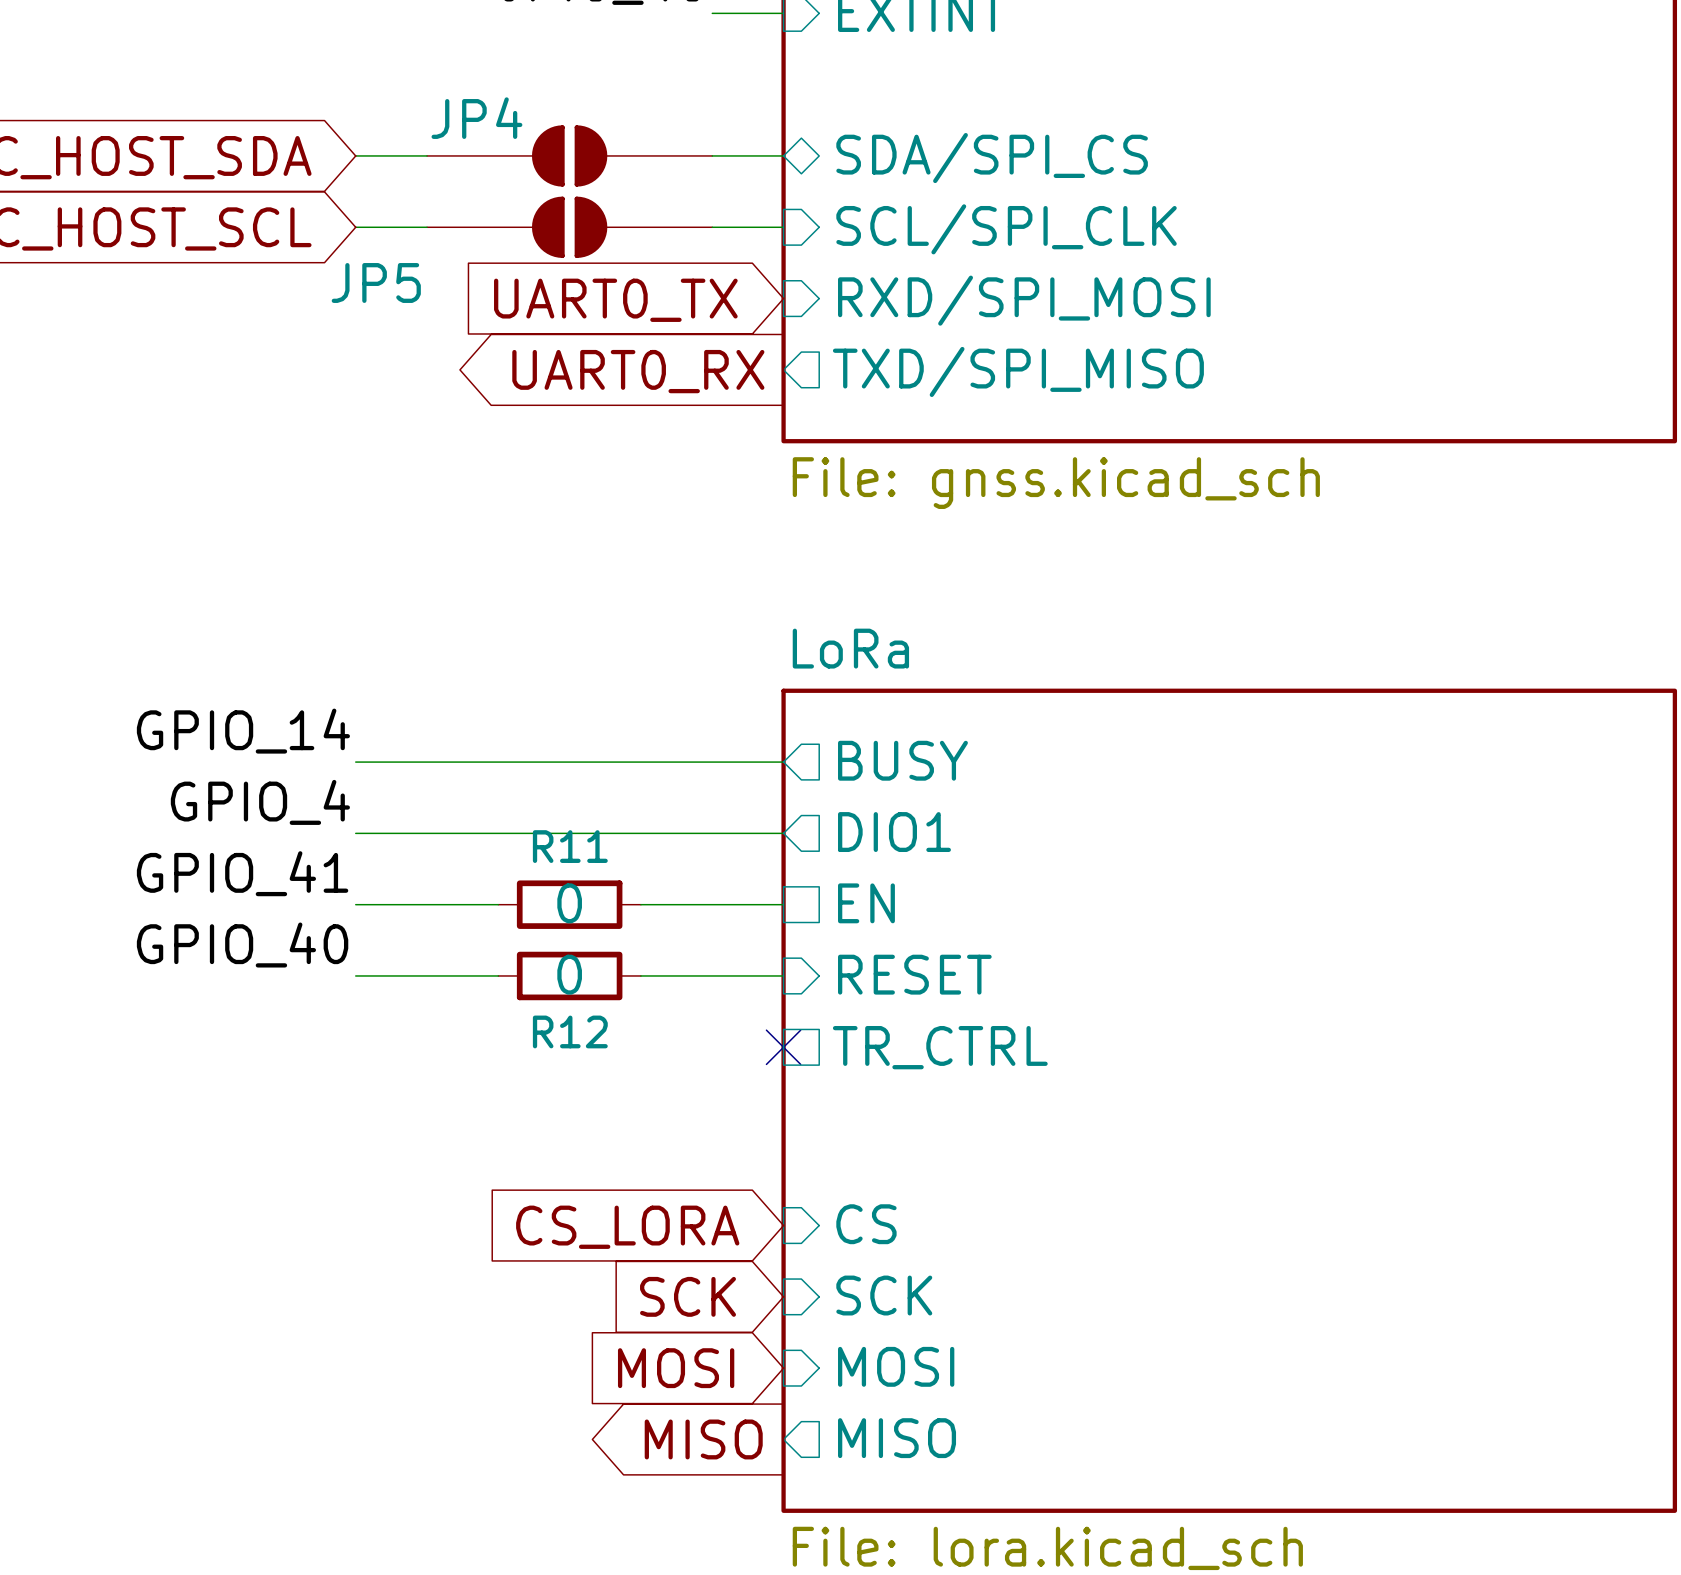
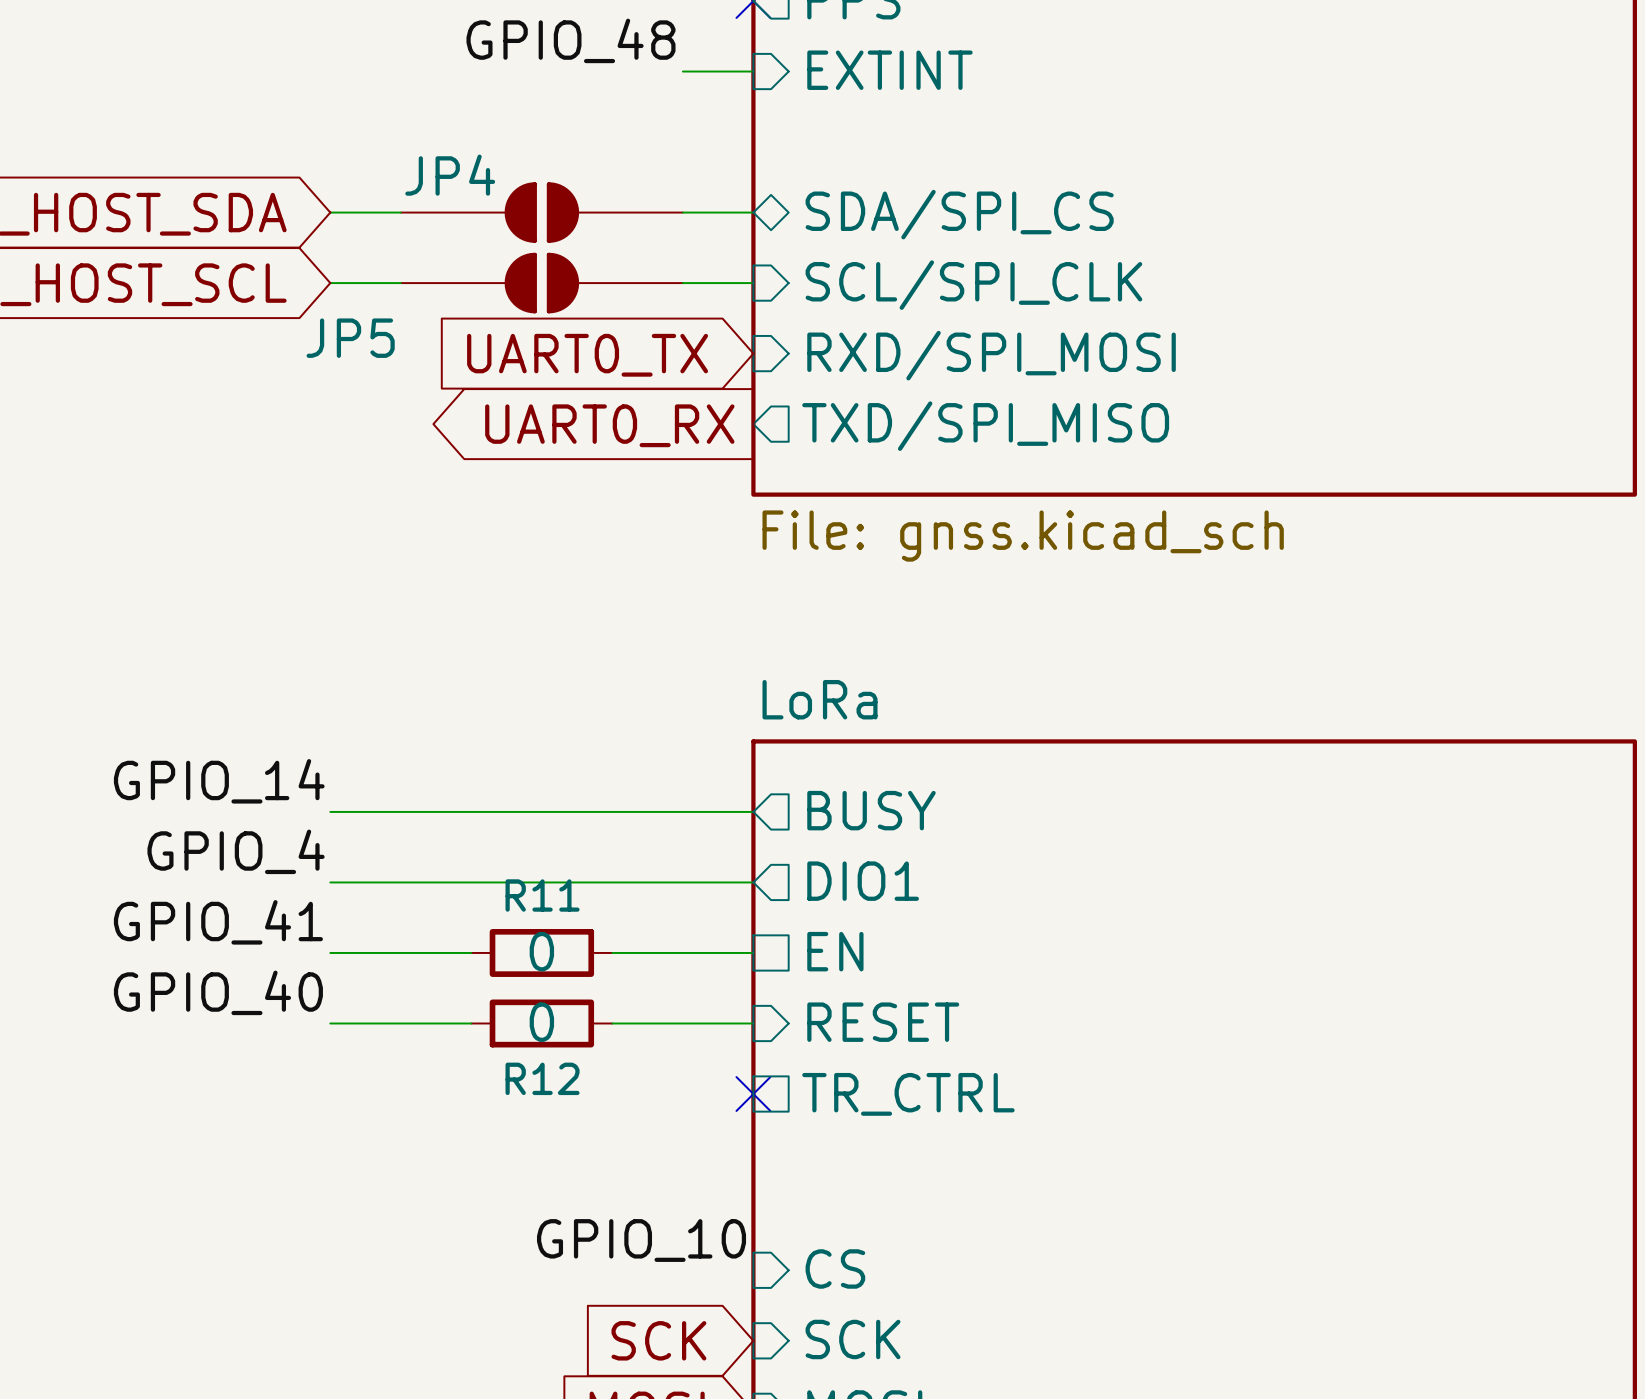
label: none -> GPIO_10 (641, 1240)
global label: CS_LORA (627, 1227) -> none

